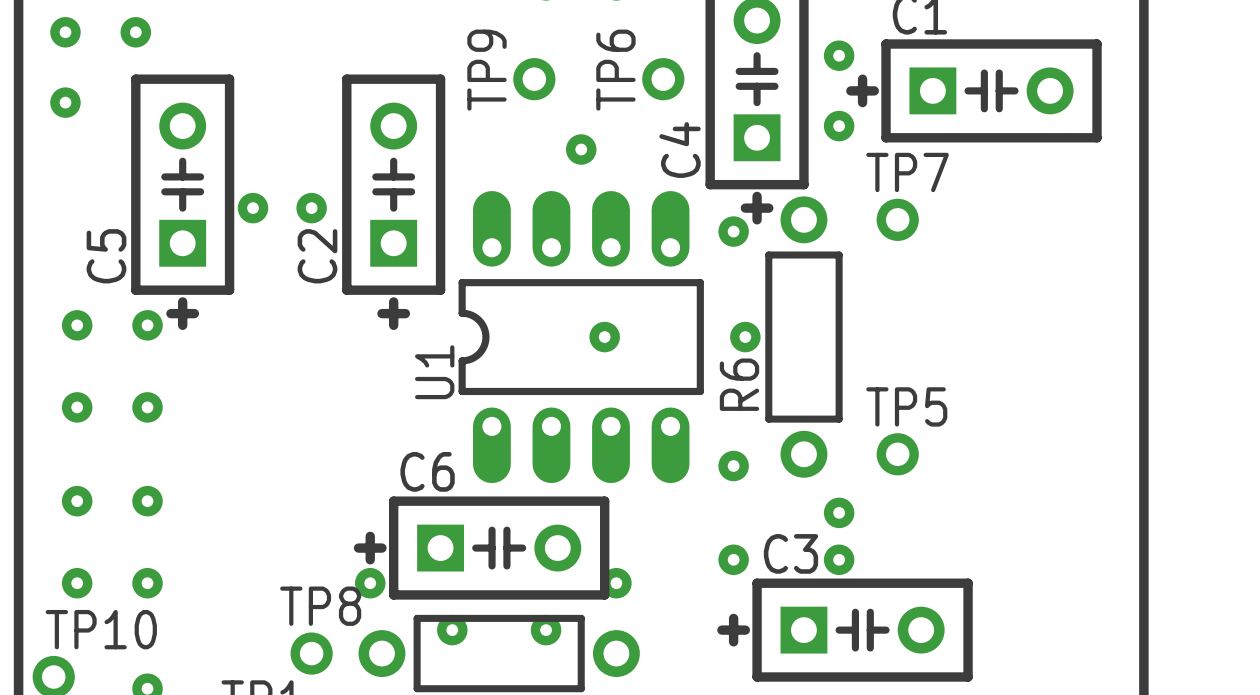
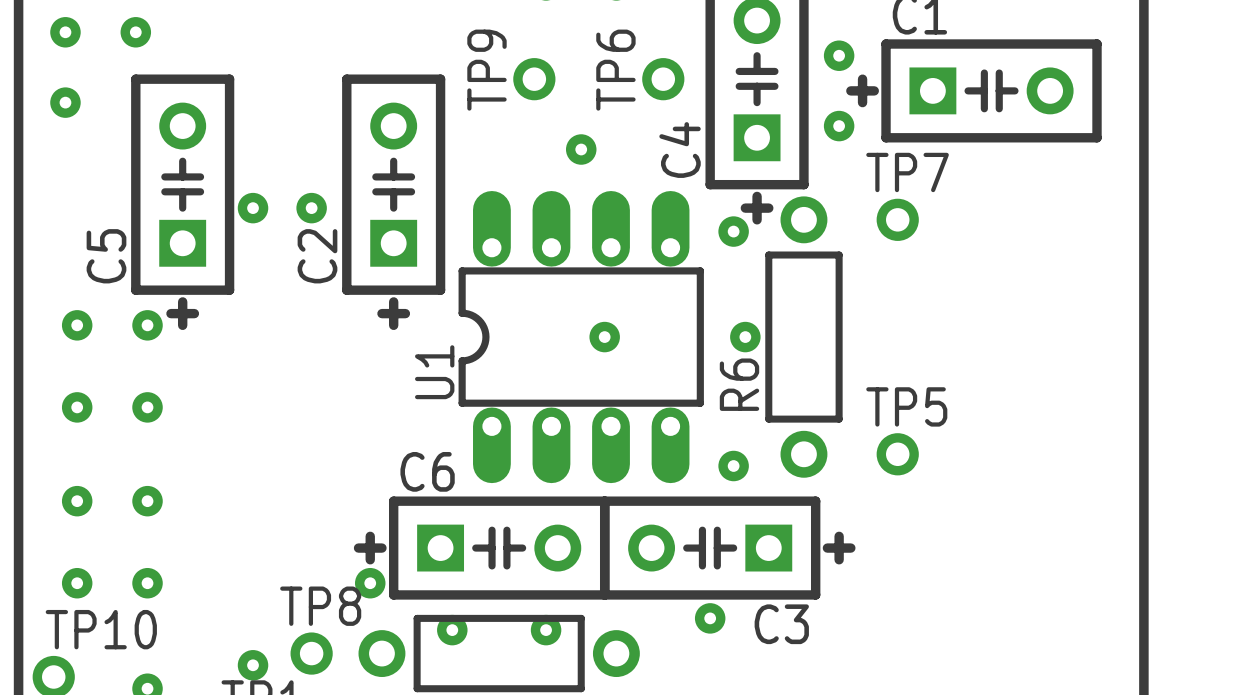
U1 footprint: [458, 191, 704, 484] -> [458, 191, 704, 484]
via: (839, 512) -> none
via: (733, 559) -> none
via: (839, 559) -> none
via: (616, 583) -> none
via: none -> (710, 618)
C3 rotation: 0° (844, 630) -> 180° (727, 548)
via: none -> (253, 665)

